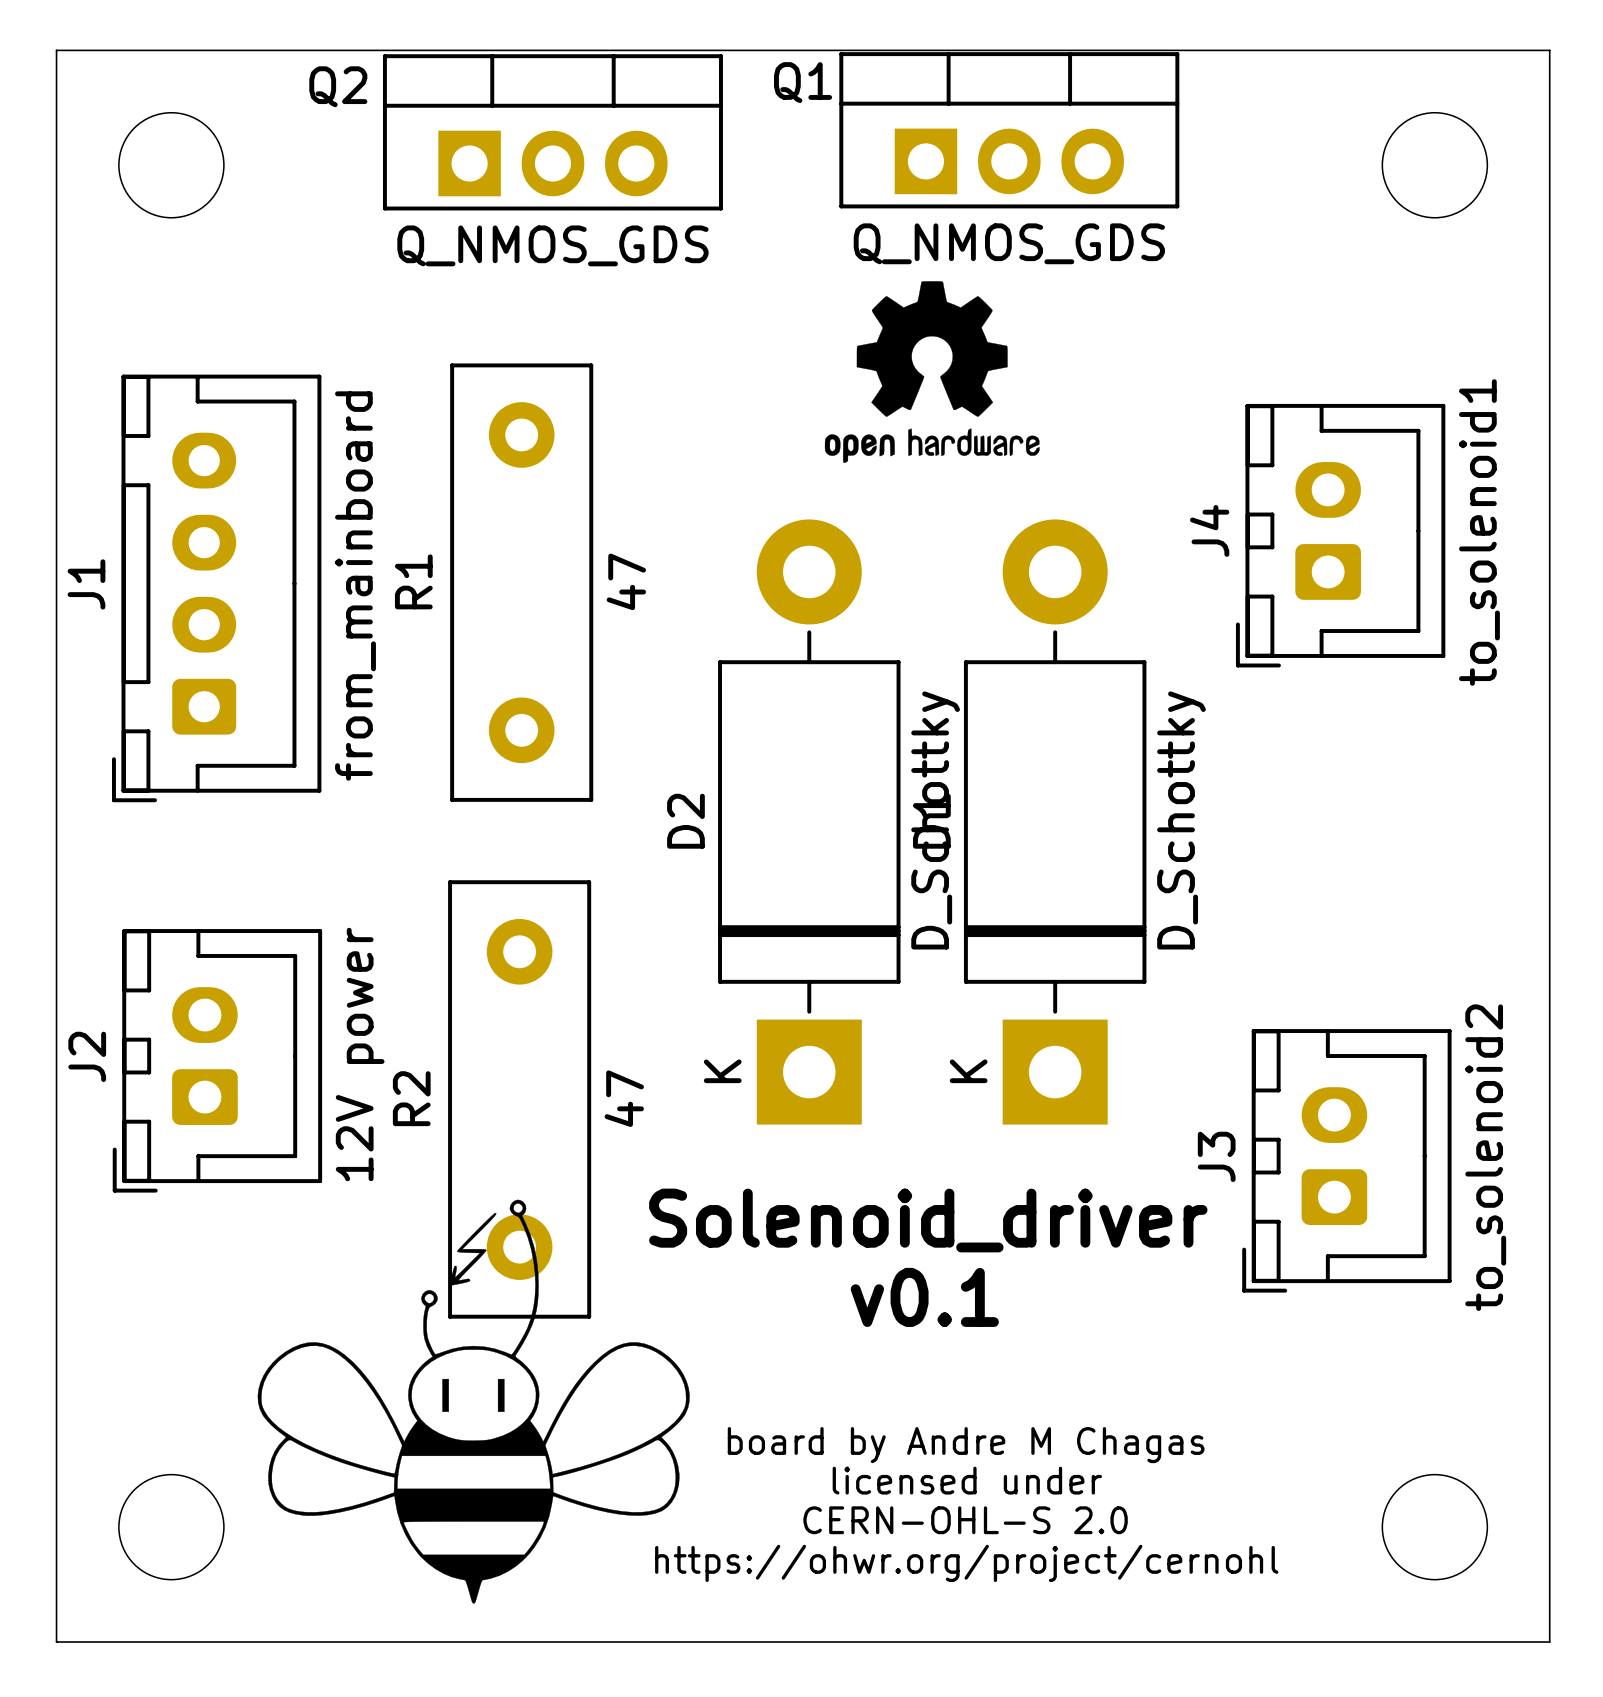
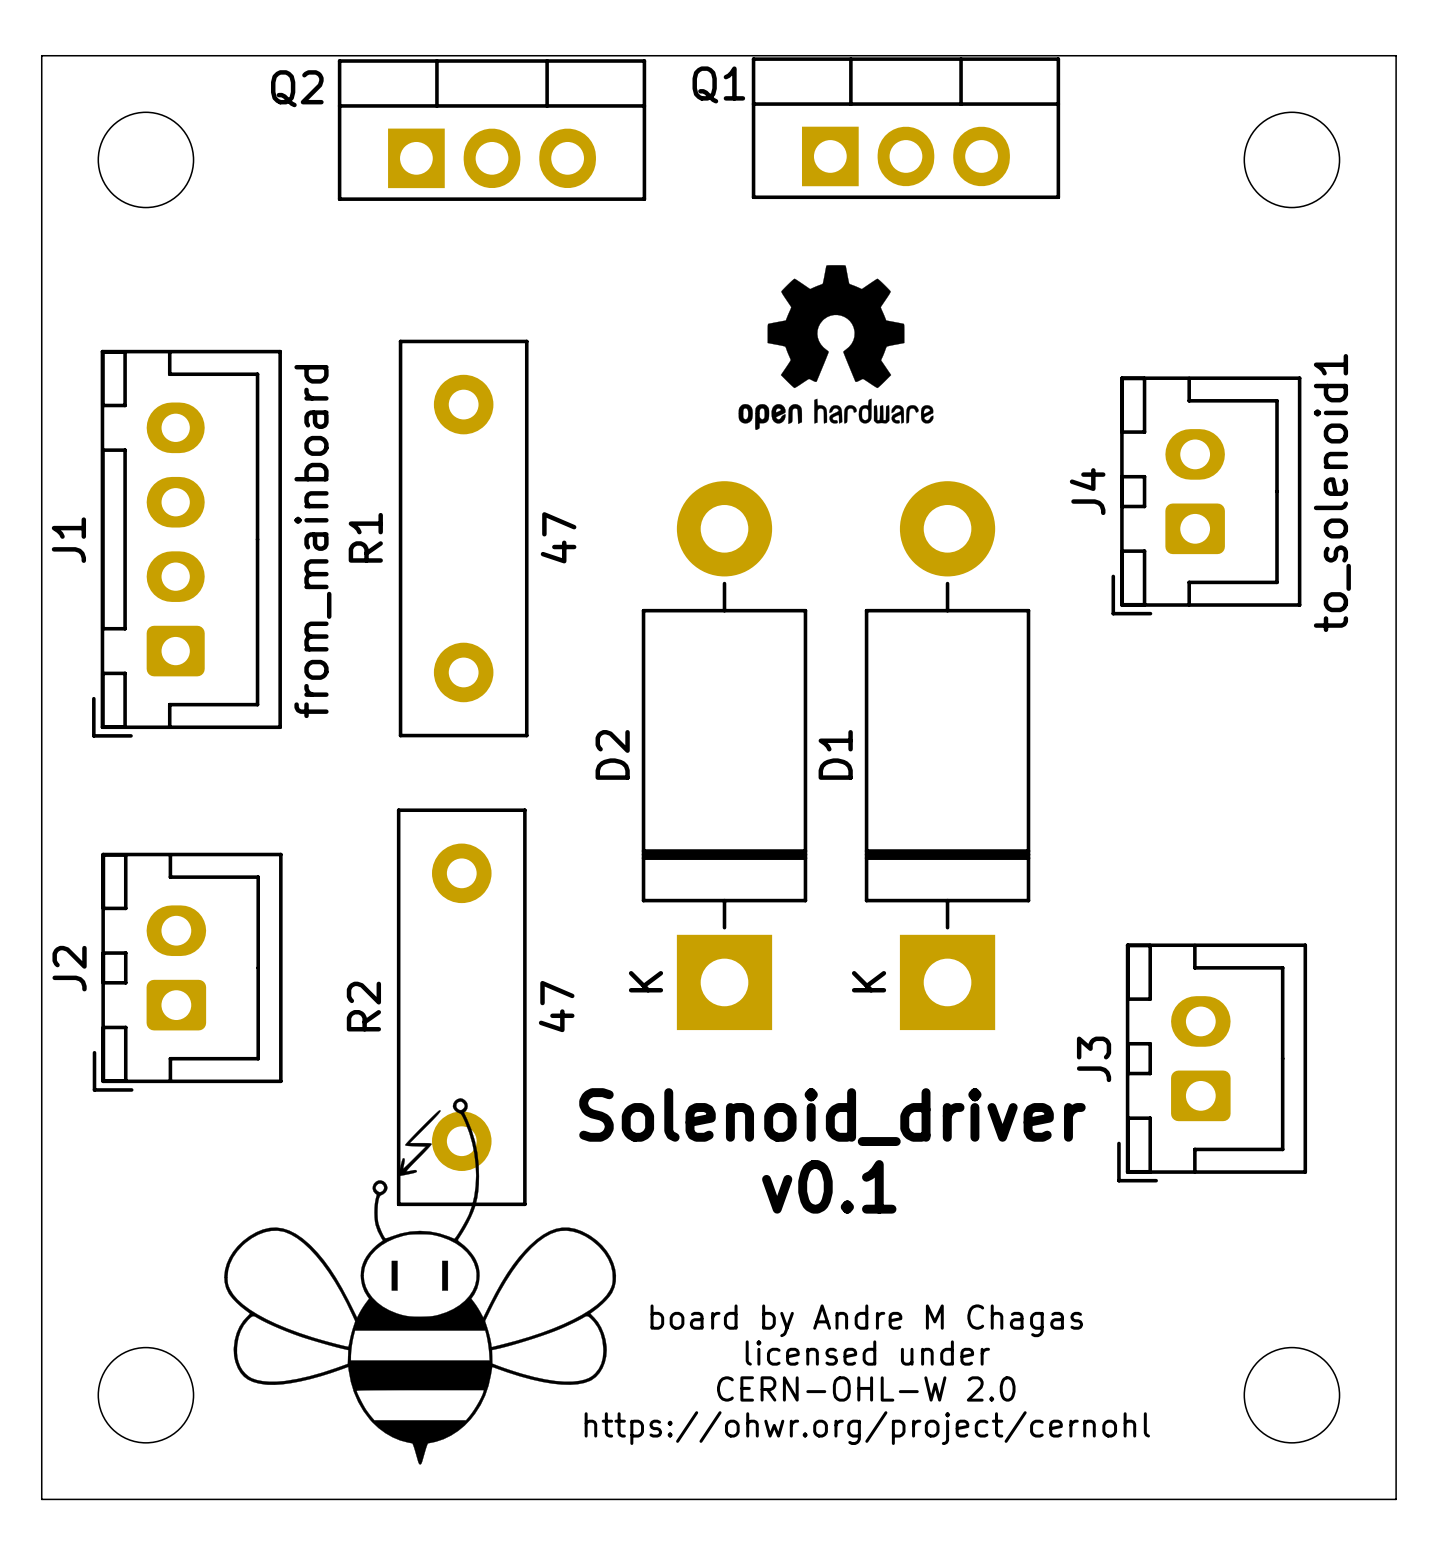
Q1 value: Q_NMOS_GDS (1009, 243) -> none
Q2 value: Q_NMOS_GDS (552, 245) -> none
D2 value: D_Schottky (935, 820) -> none
D1 value: D_Schottky (1181, 820) -> none
J2 value: 12V power (360, 1054) -> none
J3 value: to_solenoid2 (1485, 1157) -> none
text: CERN-OHL-S 2.0 (965, 1520) -> CERN-OHL-W 2.0 (866, 1388)

